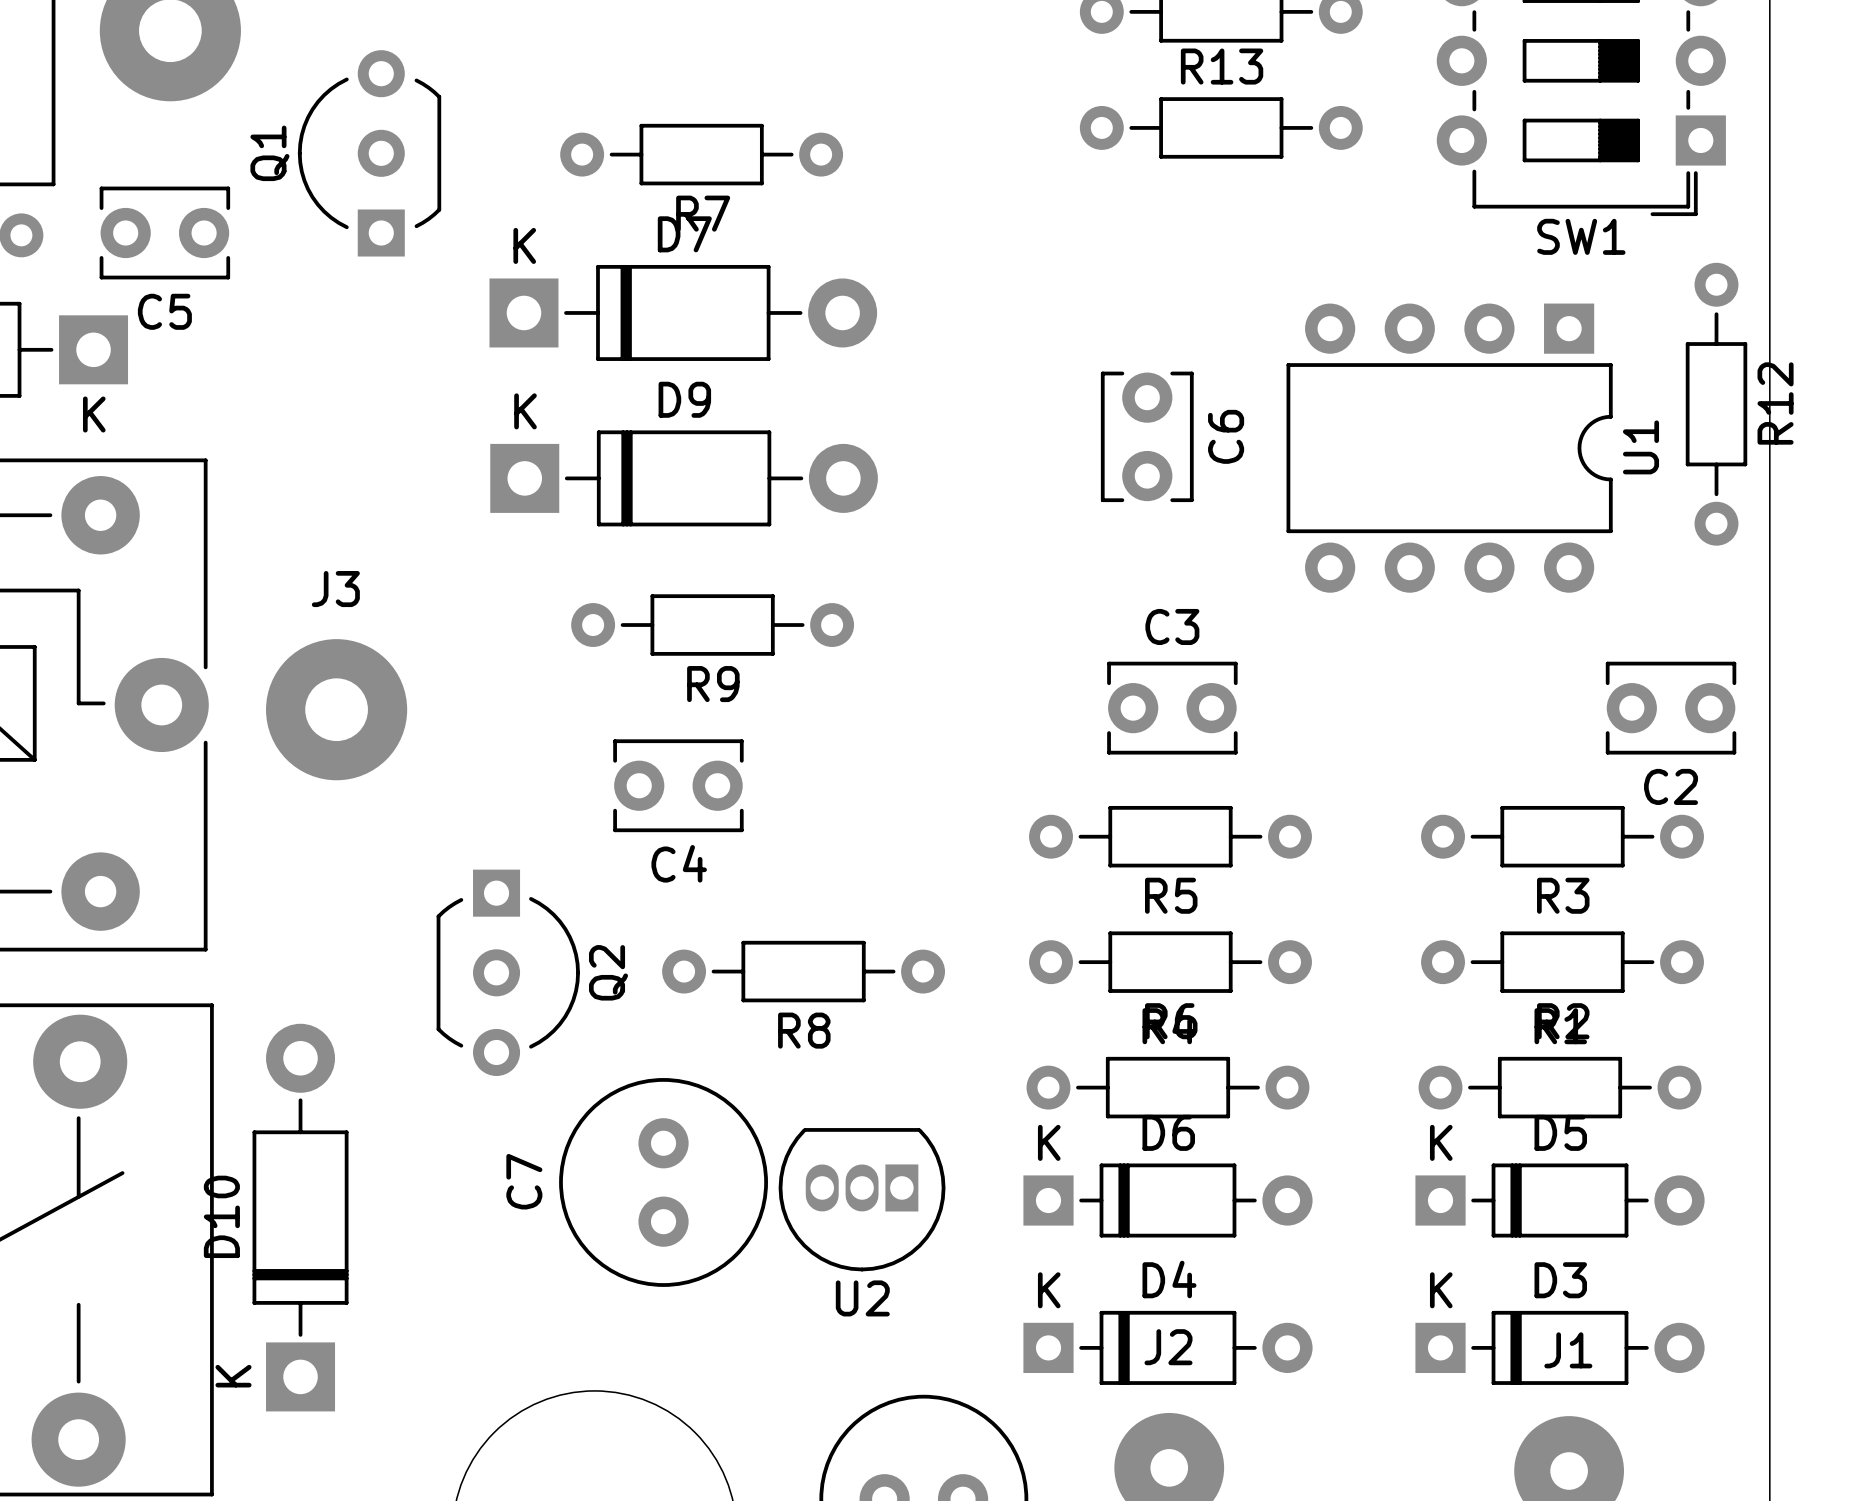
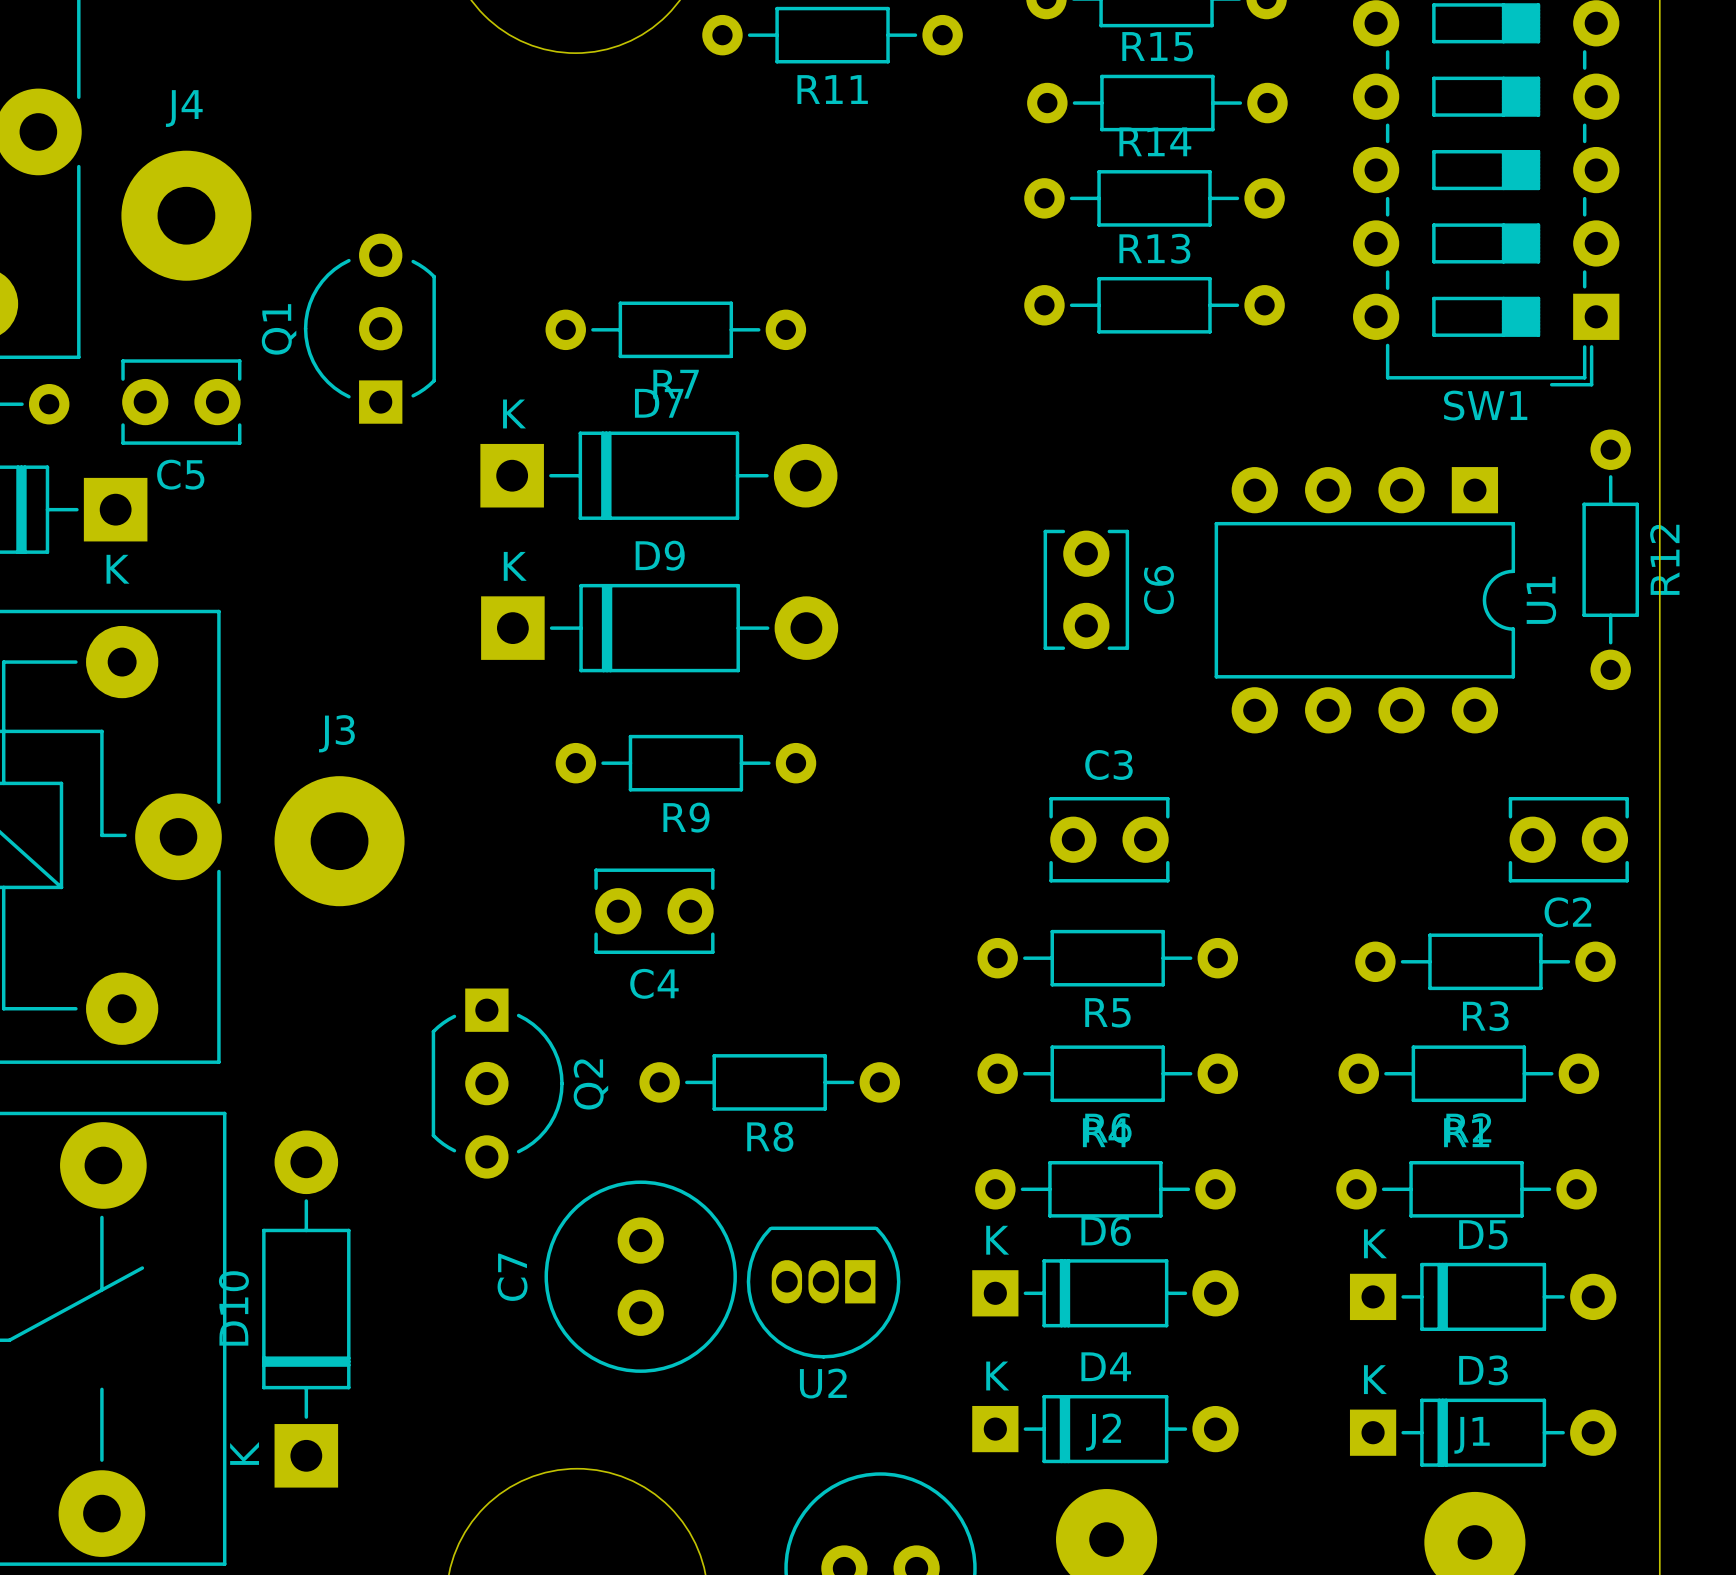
R3 position: (1562, 836) -> (1485, 961)
D5 position: (1560, 1200) -> (1483, 1296)
D3 position: (1560, 1347) -> (1483, 1432)

